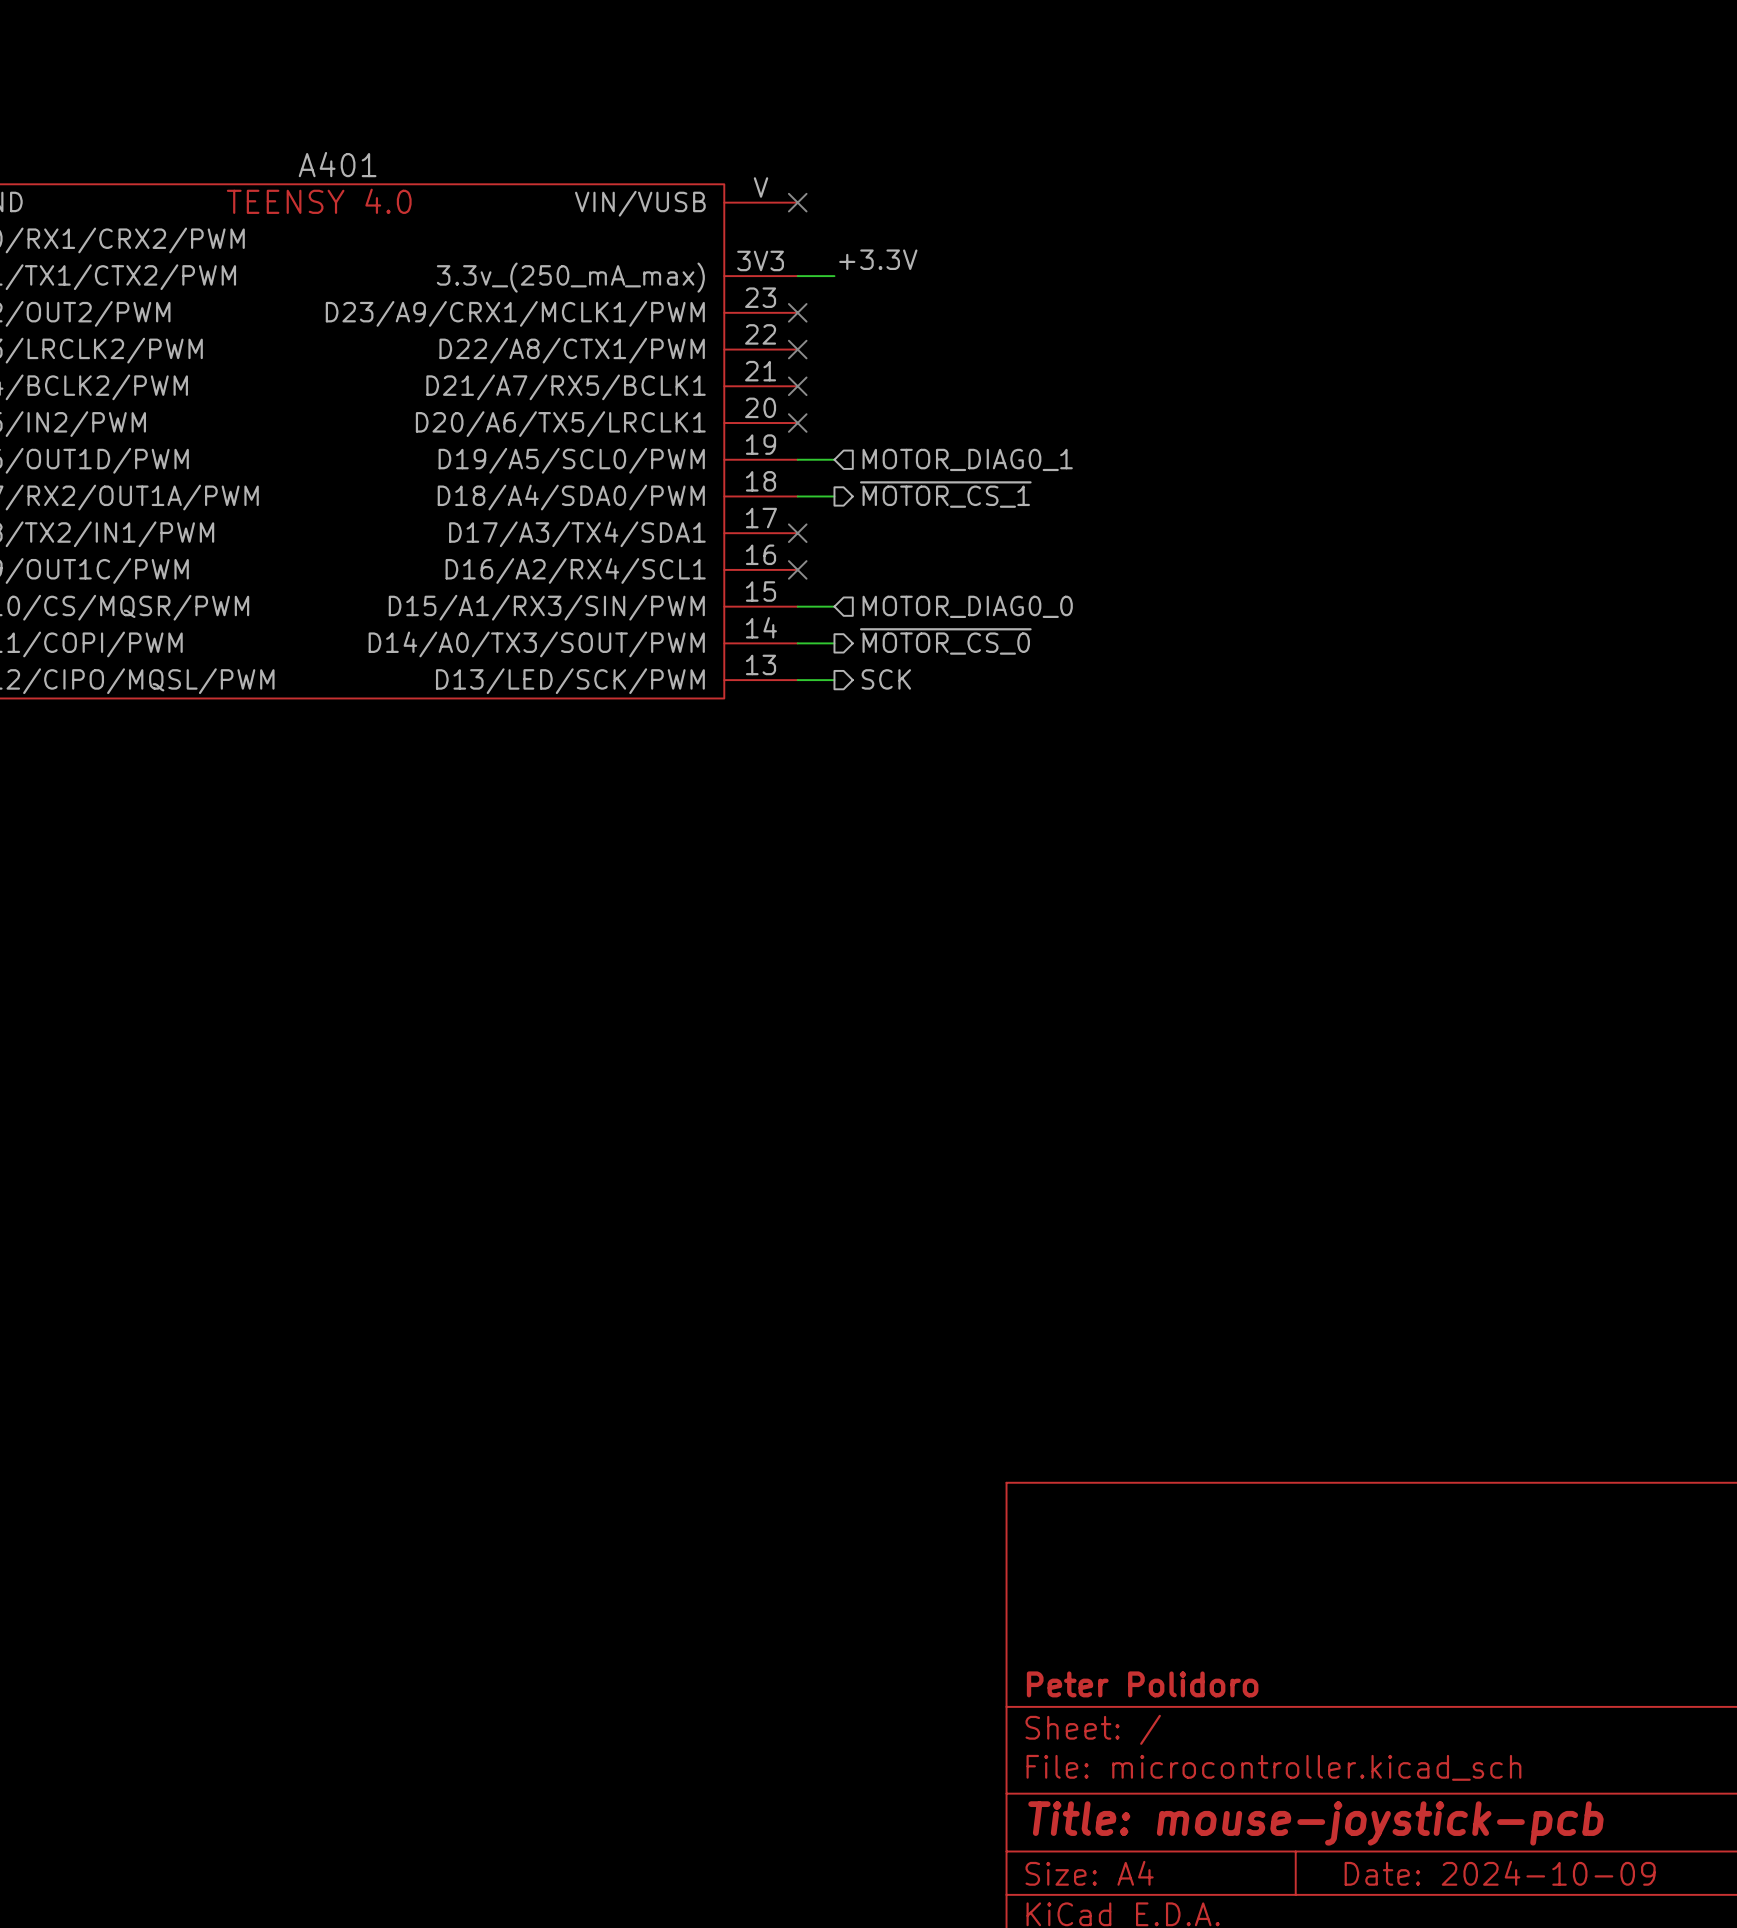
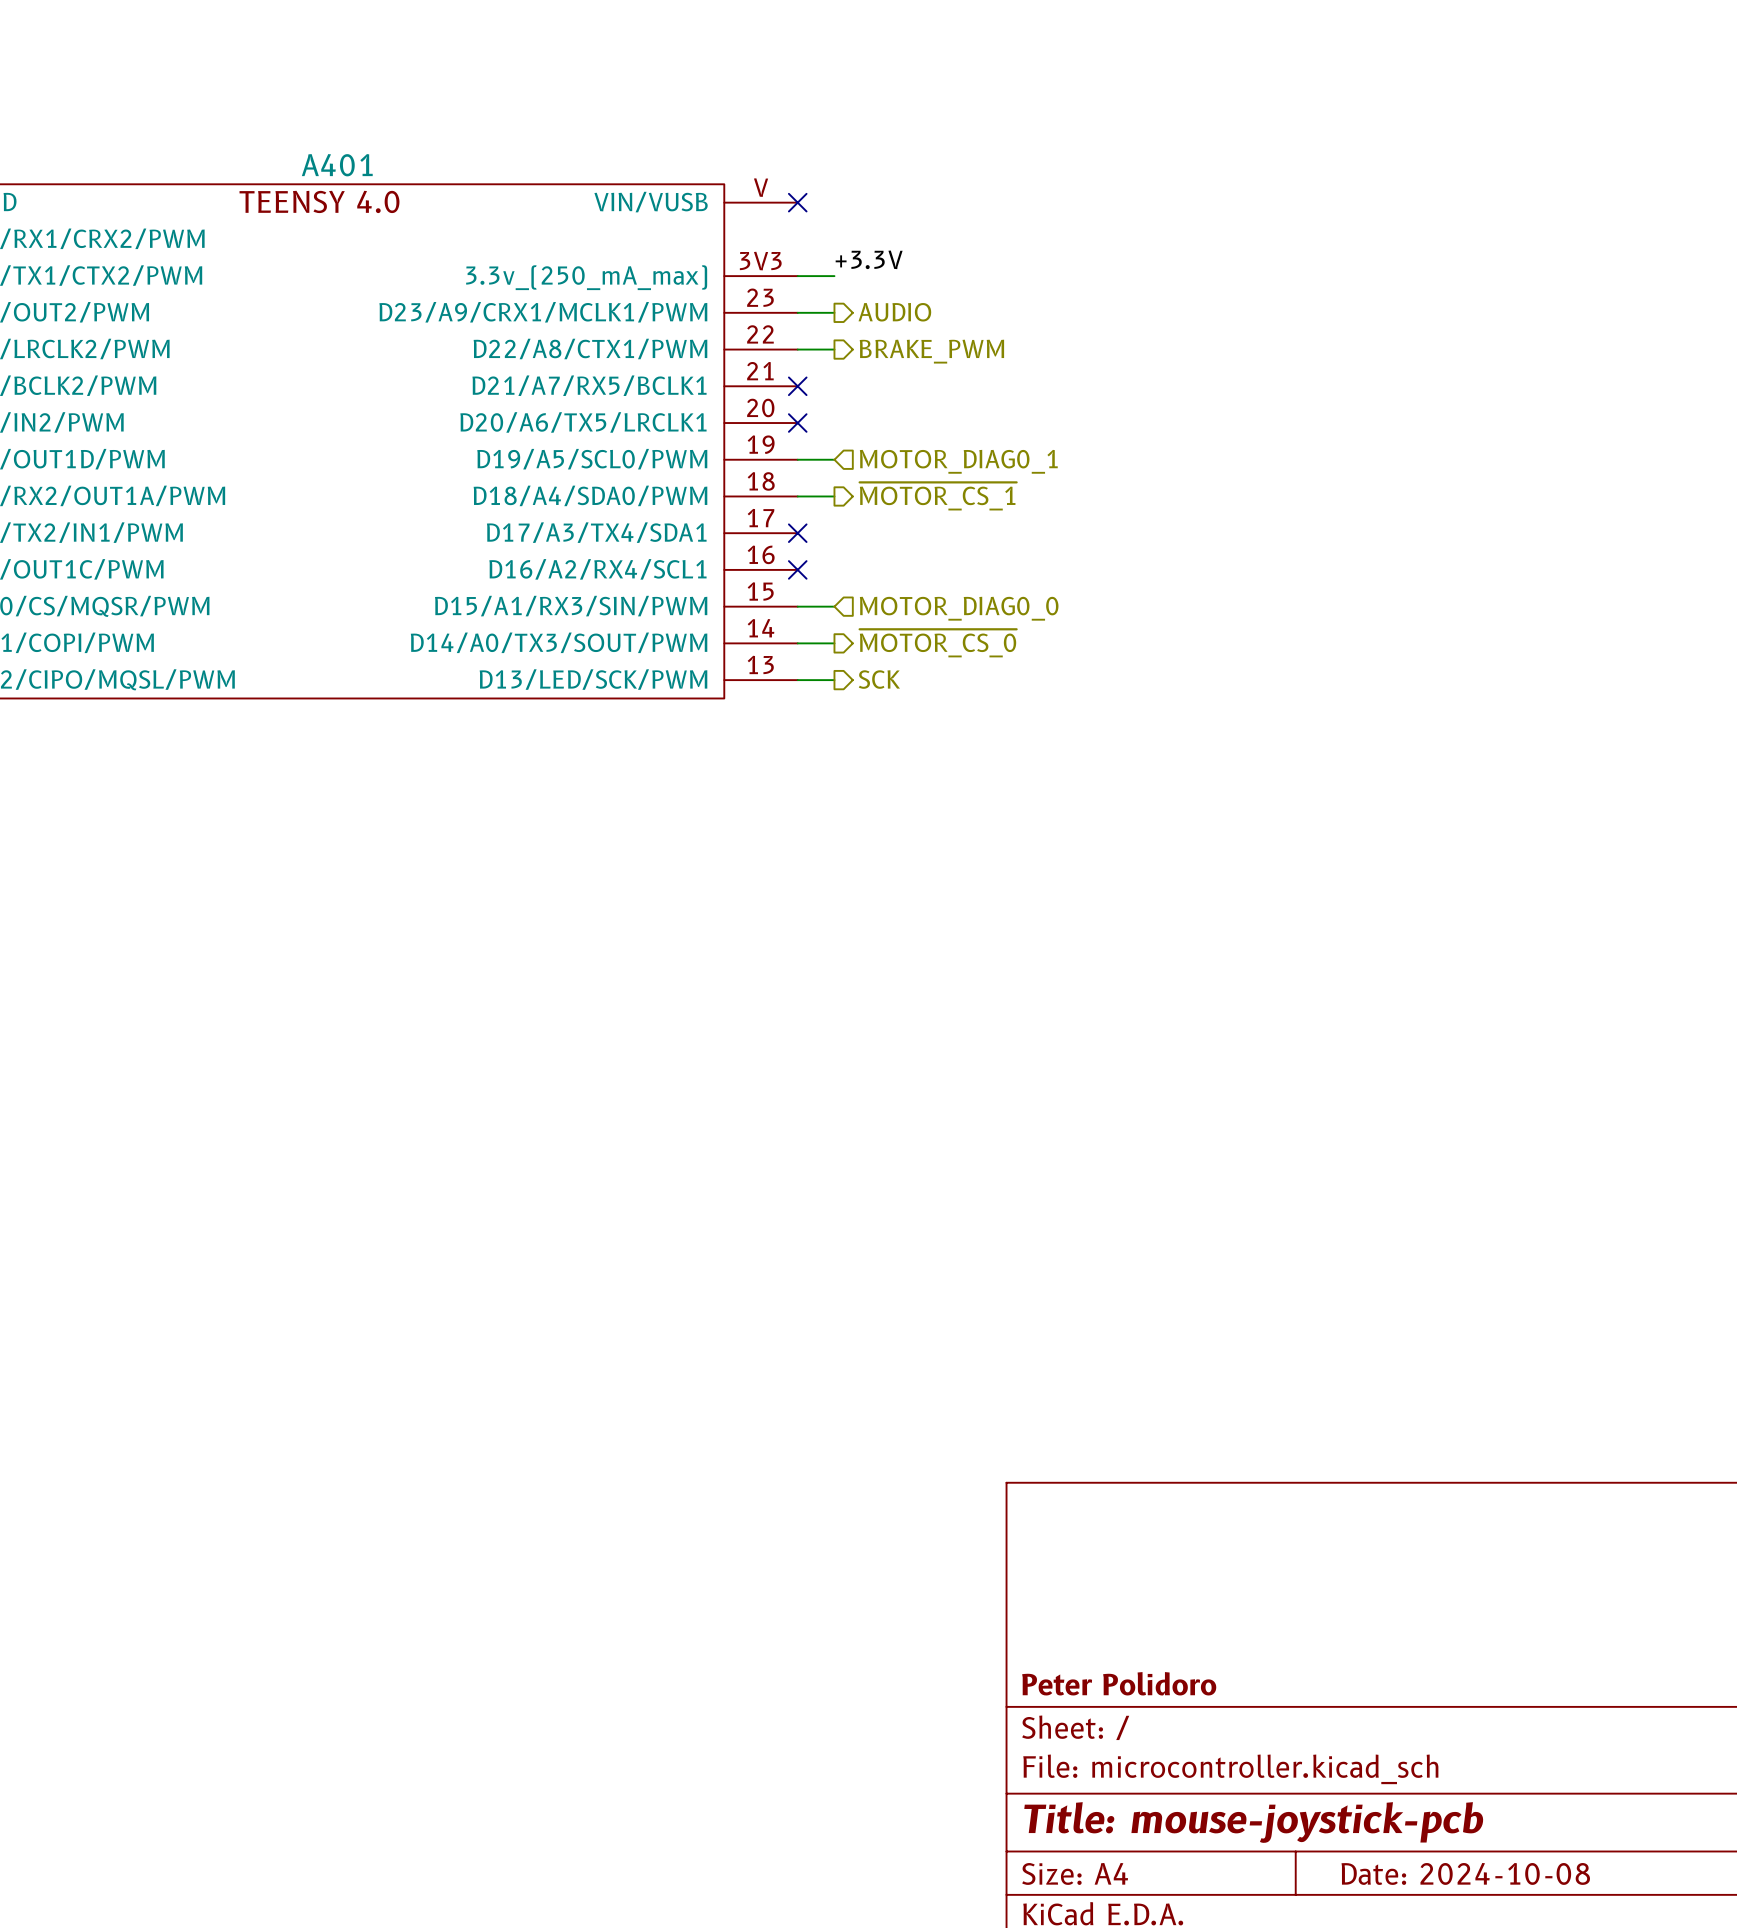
wire: none -> (797, 312) (834, 312)
no-connect mark: (797, 312) -> none
hierarchical label: none -> AUDIO (894, 312)
wire: none -> (797, 349) (834, 349)
no-connect mark: (797, 349) -> none
hierarchical label: none -> BRAKE_PWM (931, 351)
title block: Date: 2024-10-09 (1500, 1873) -> Date: 2024-10-08 (1465, 1873)

